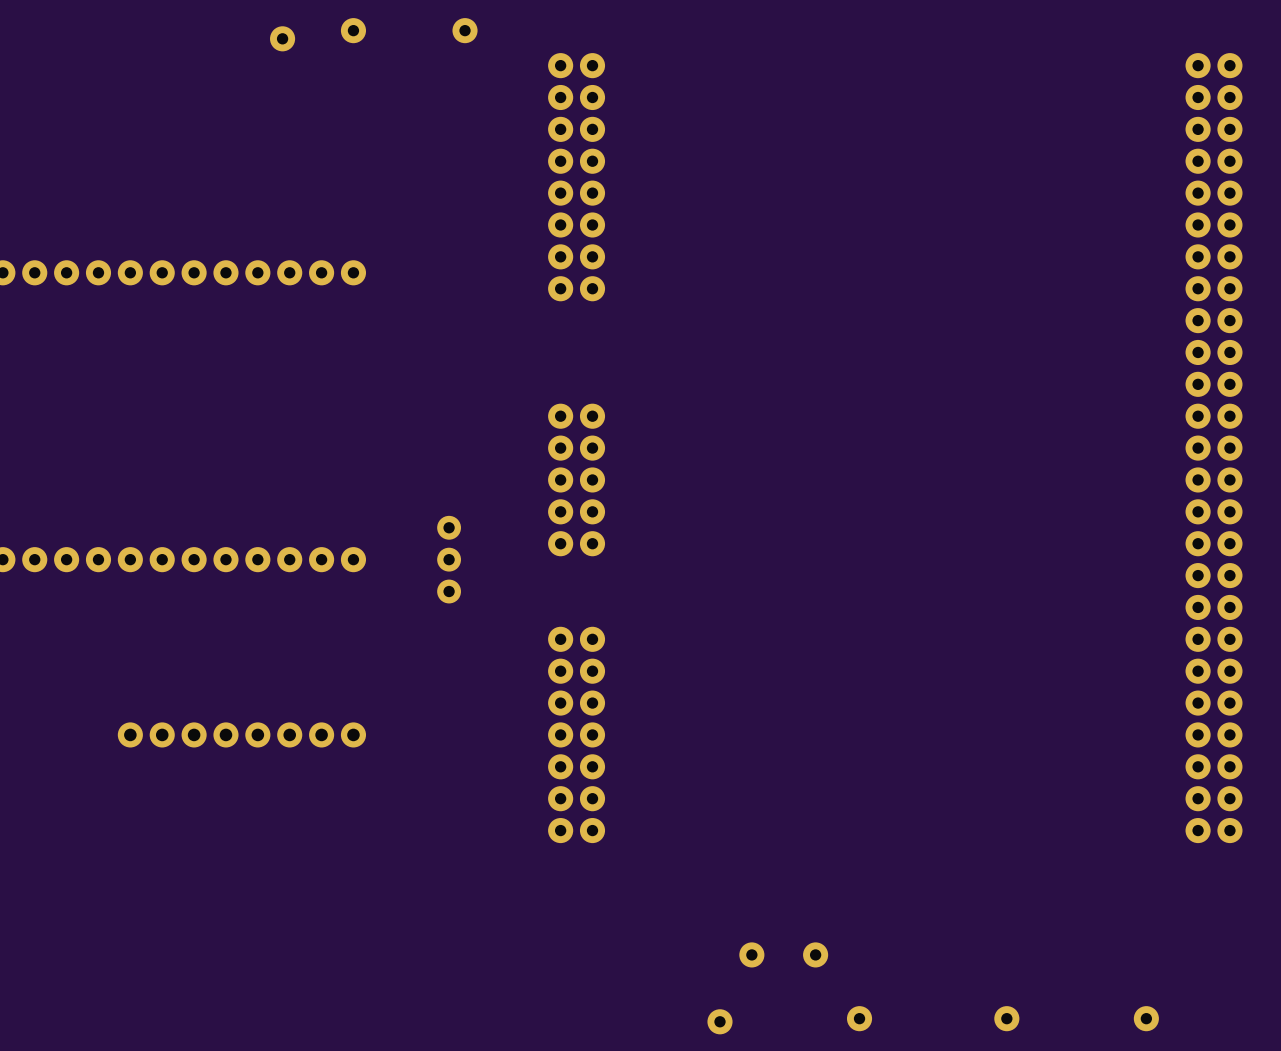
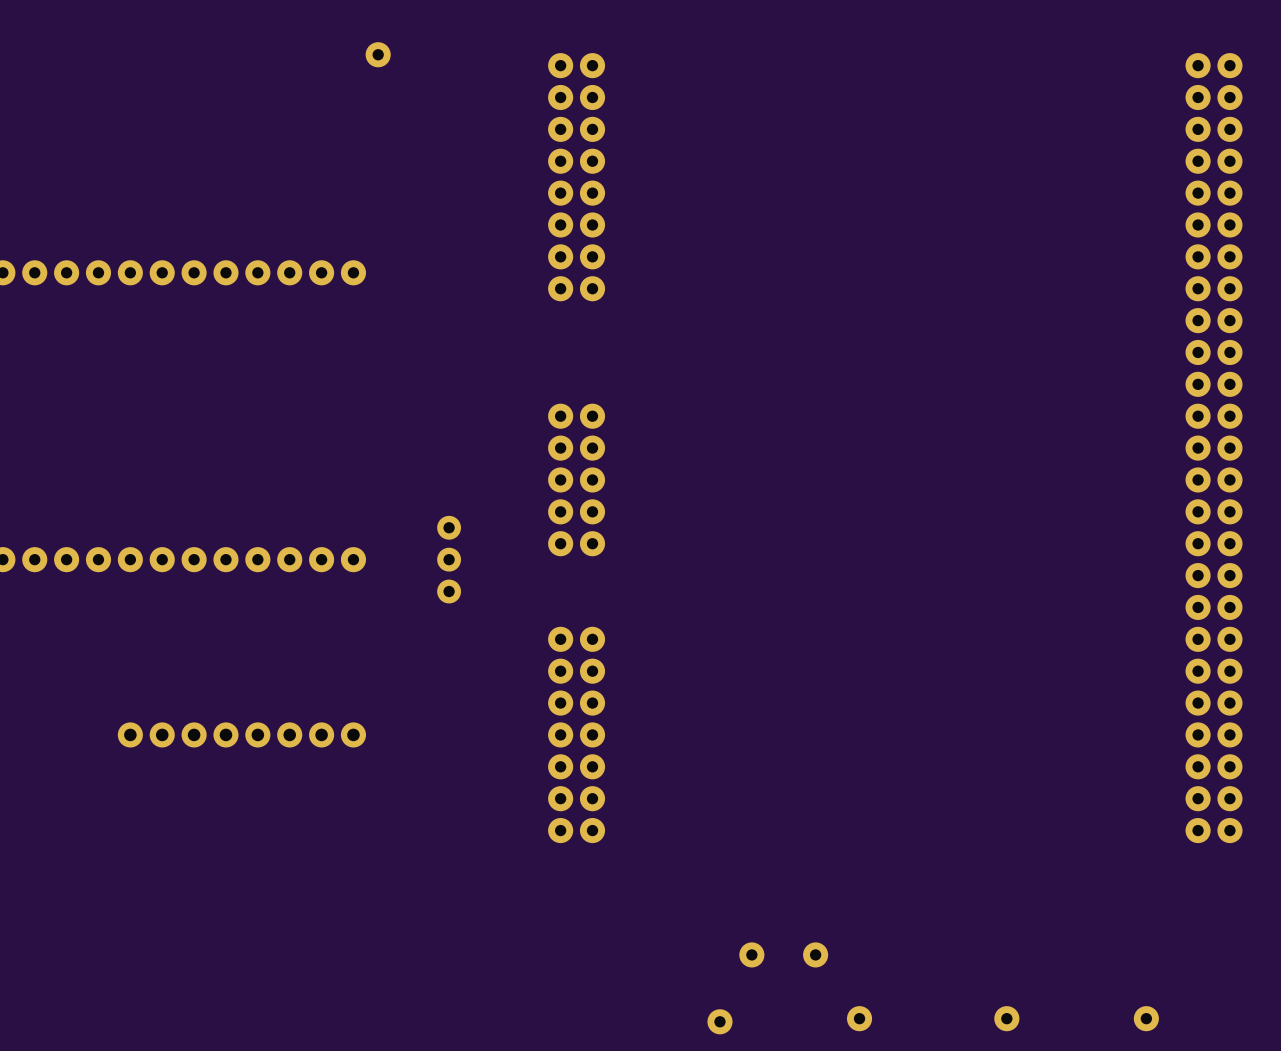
part position: (353, 30) -> (378, 54)
part: (465, 30) -> none
part: (282, 38) -> none

